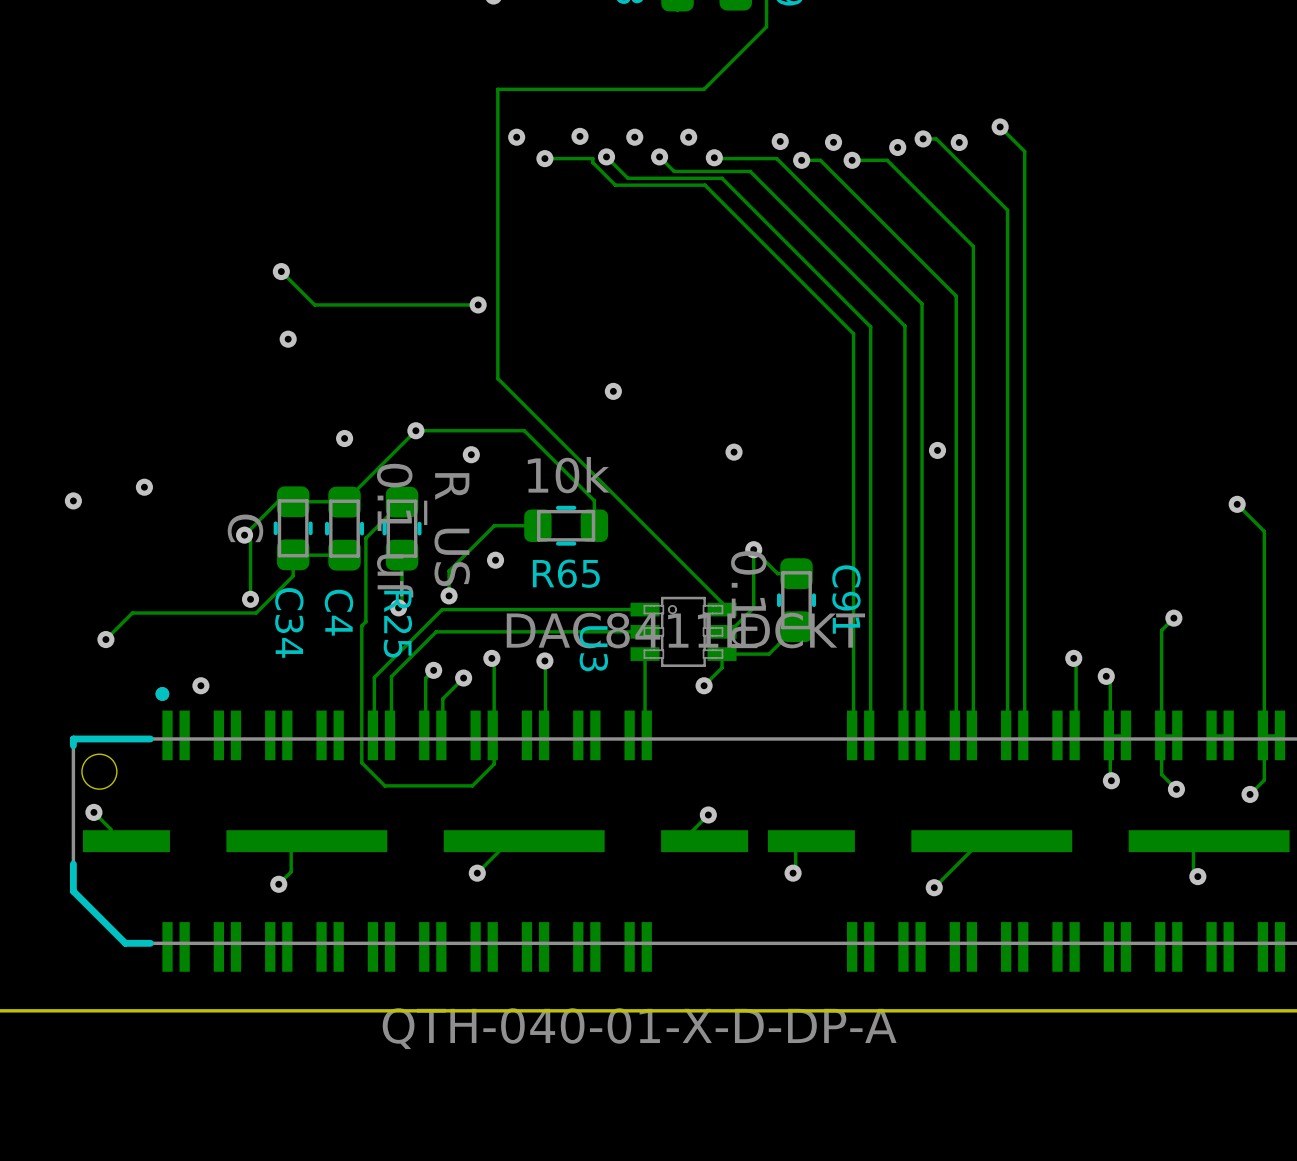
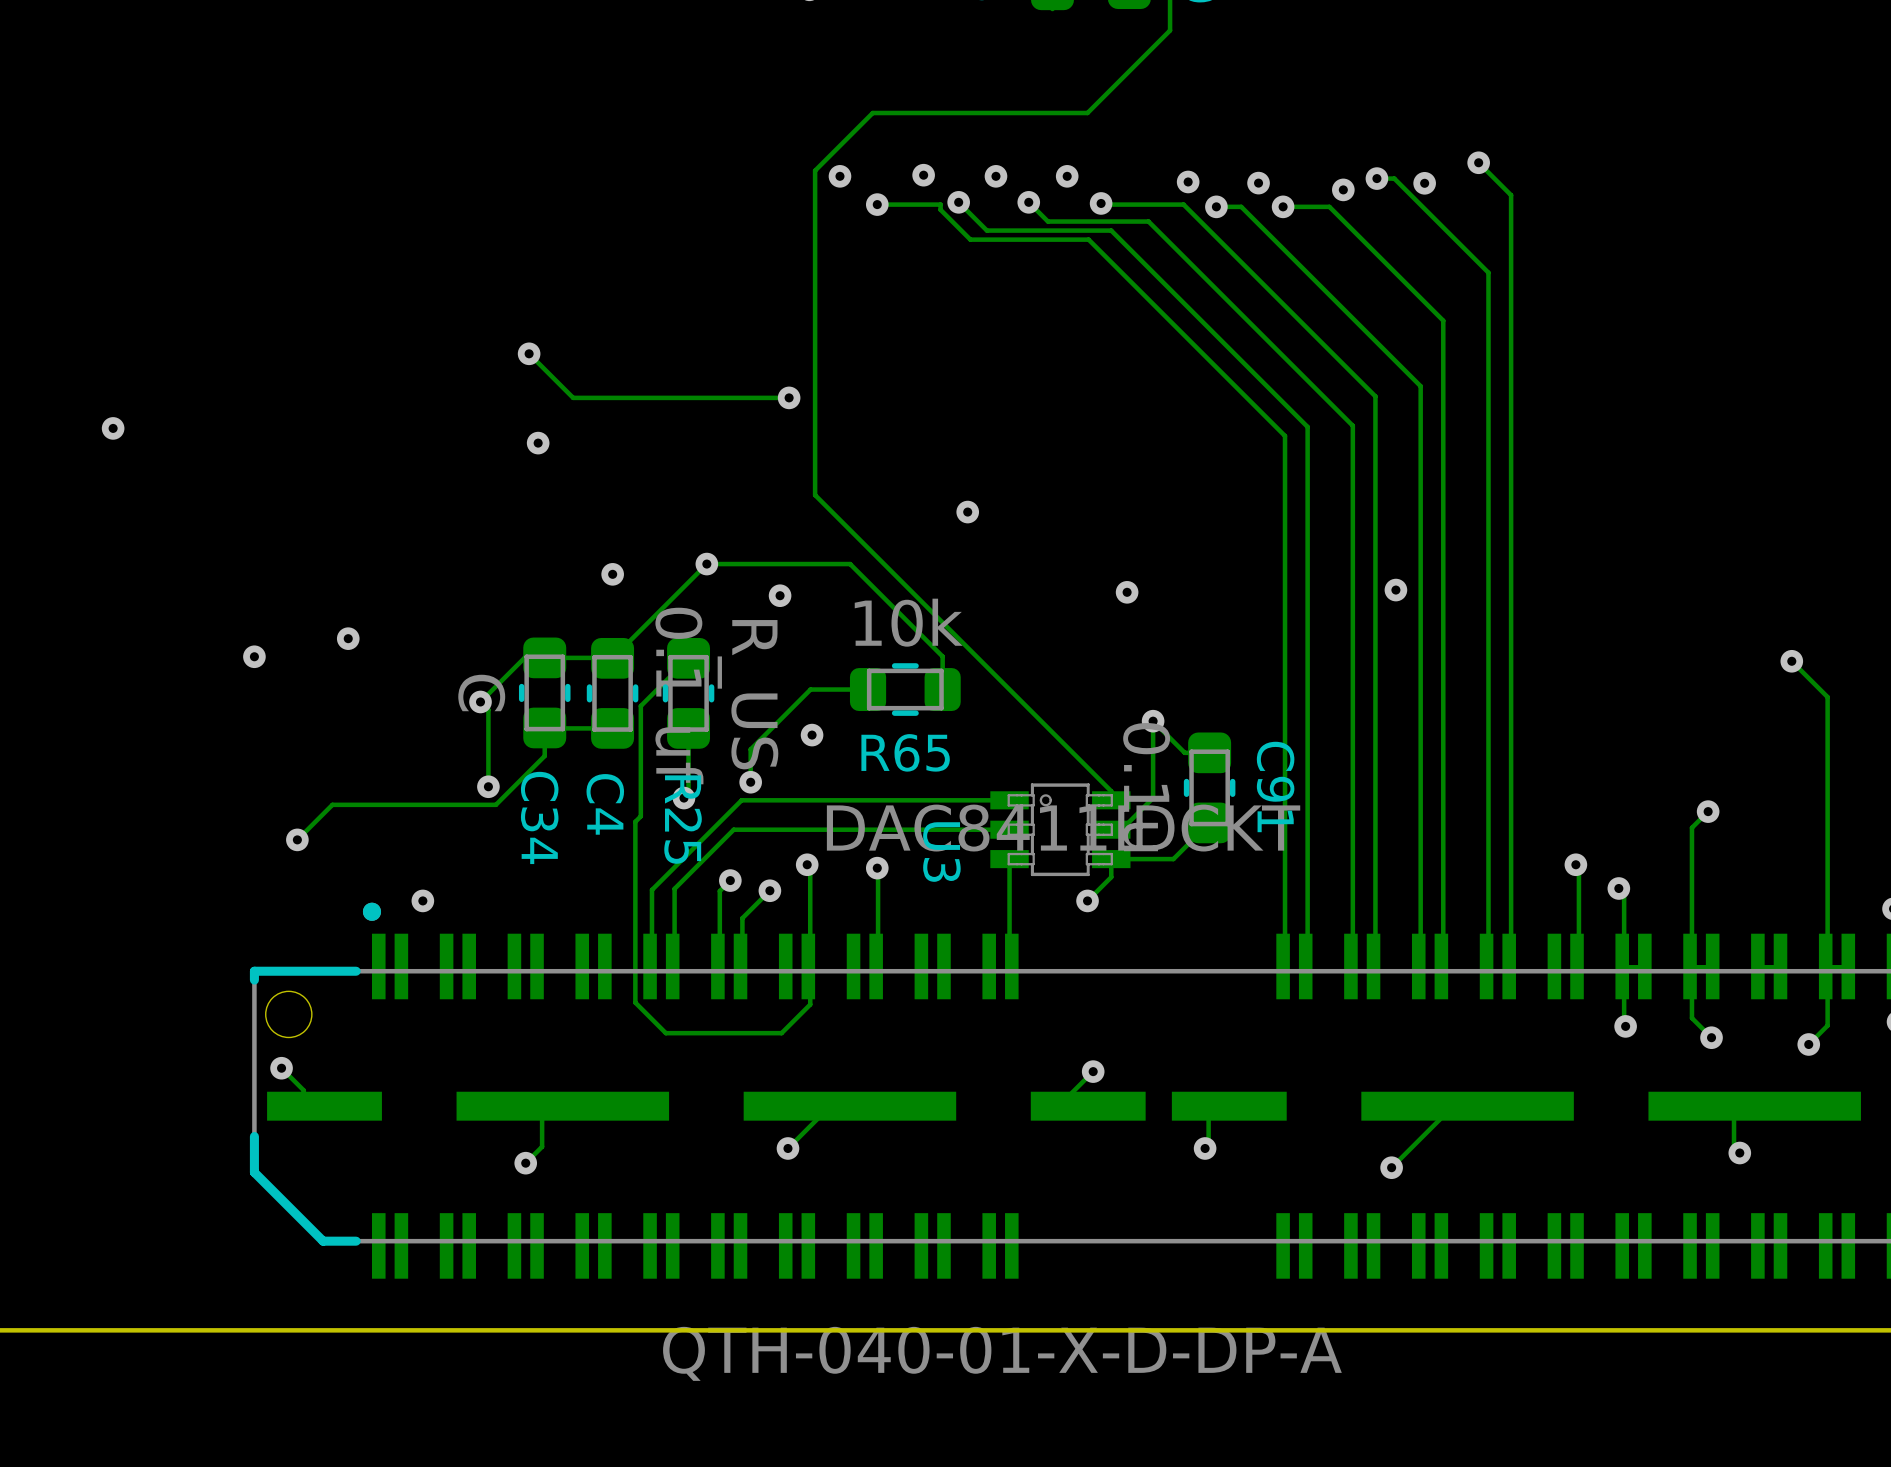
track: (541, 89) (497, 89) (497, 132) -> (872, 113) (815, 170)

